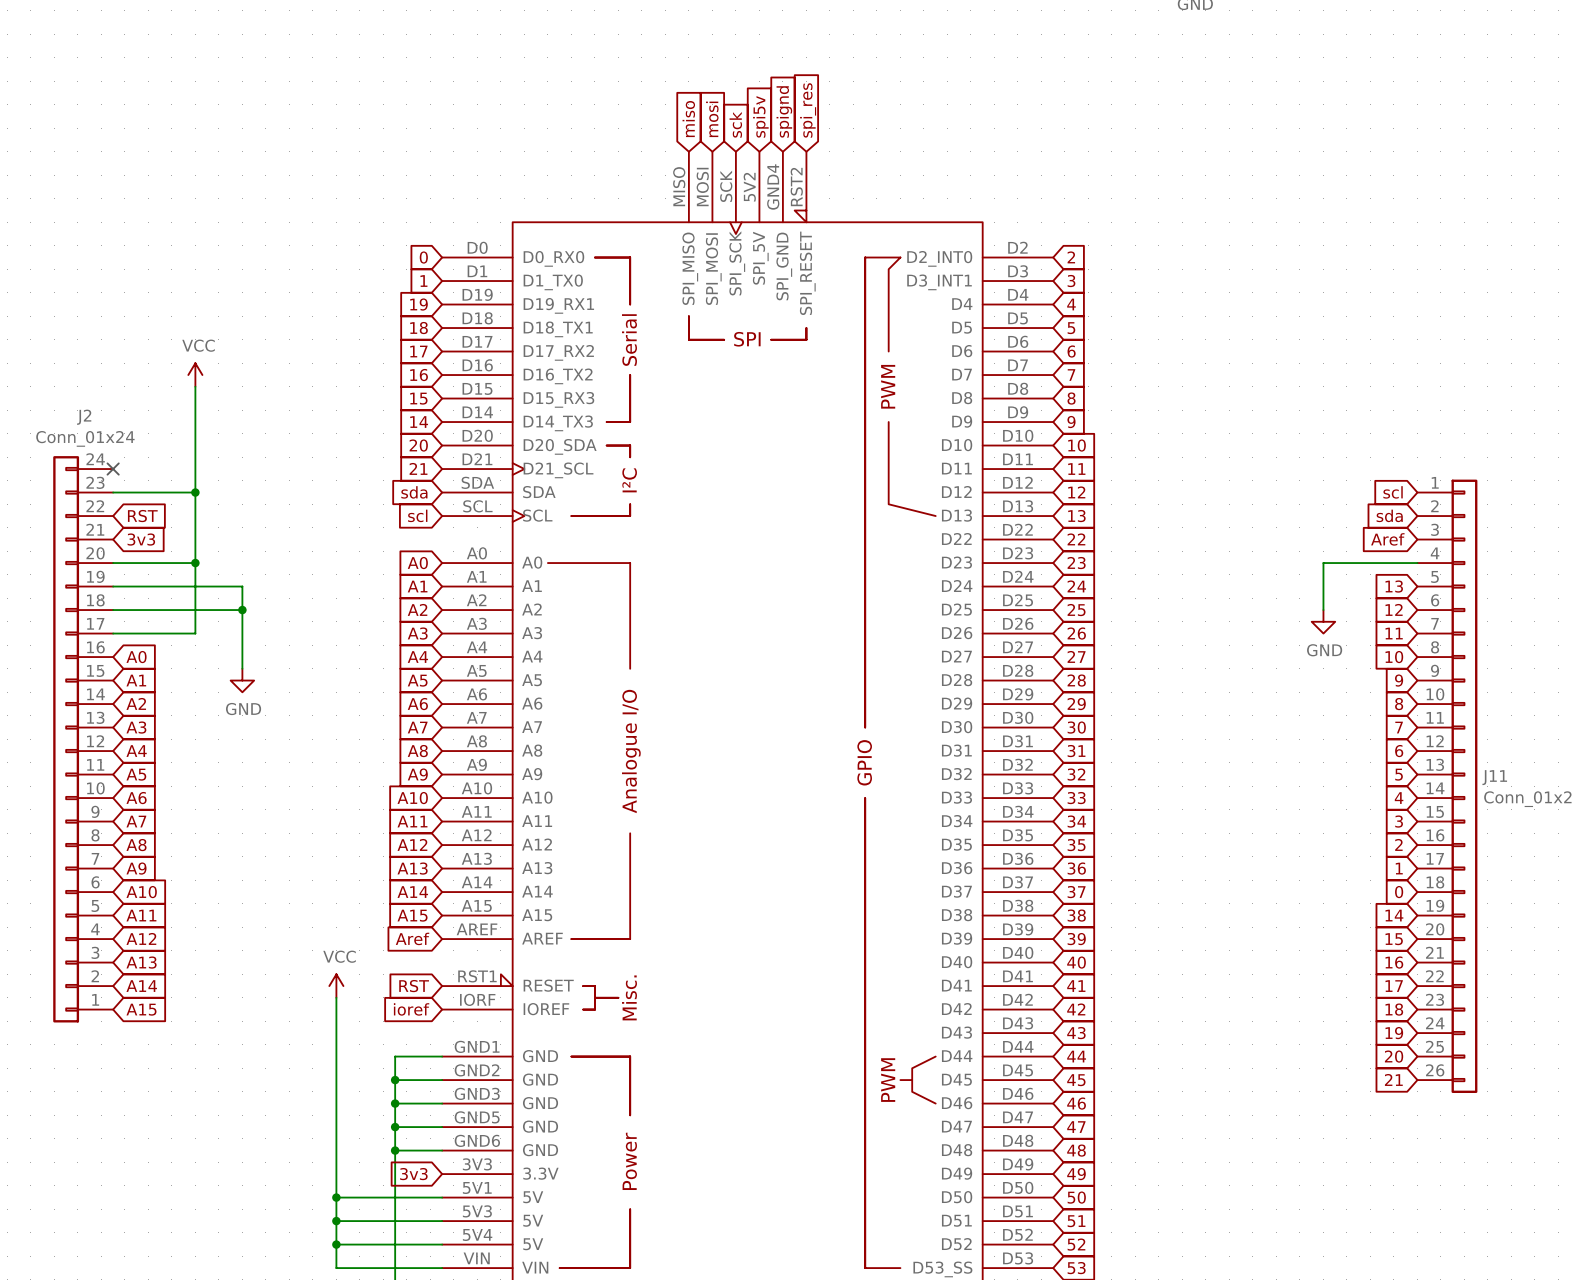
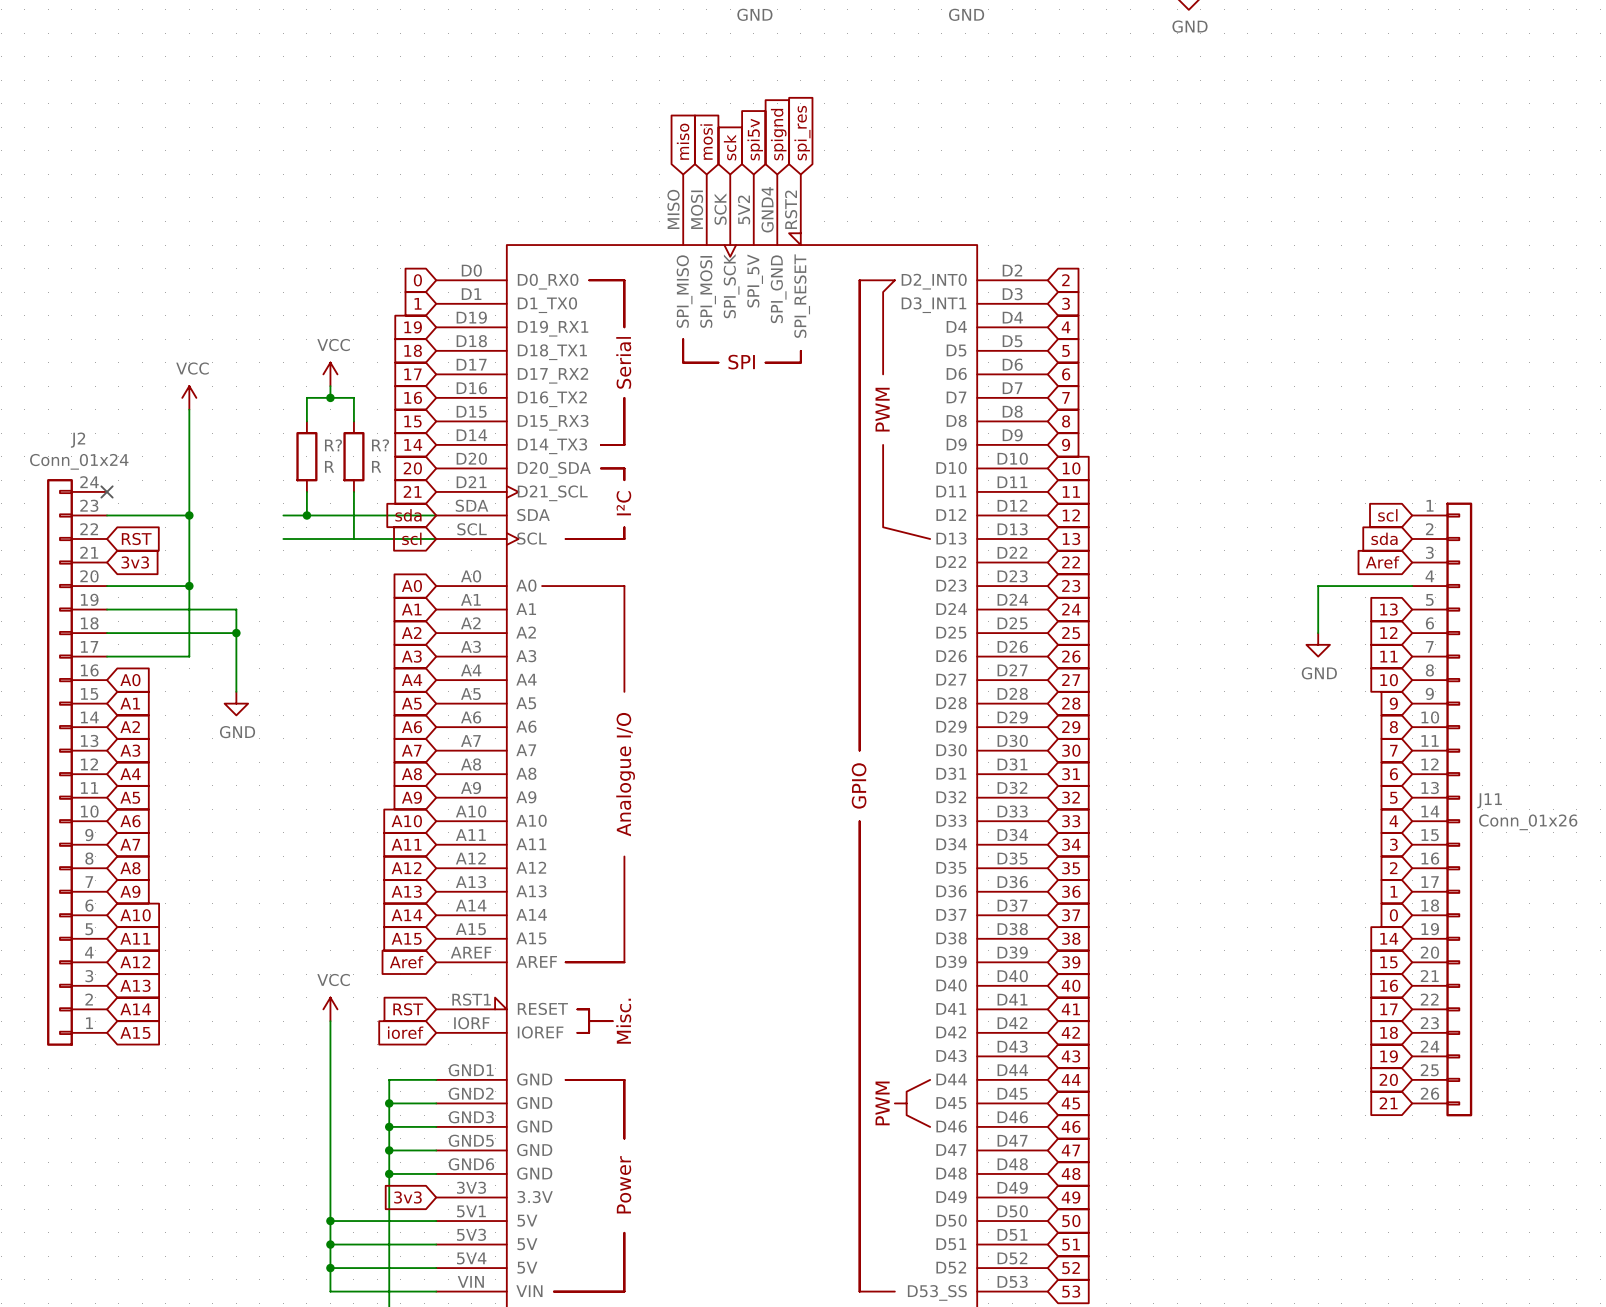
power symbol: none -> VCC (330, 374)
wire: none -> (330, 386) (330, 397)
junction: none -> (330, 397)
wire: none -> (306, 421) (306, 397) (353, 397) (353, 421)
R?: none -> R (306, 456)
R?: none -> R (353, 456)
wire: none -> (306, 491) (306, 515)
wire: none -> (353, 491) (353, 539)
wire: none -> (283, 515) (436, 515)
junction: none -> (306, 515)
wire: none -> (283, 539) (436, 539)

